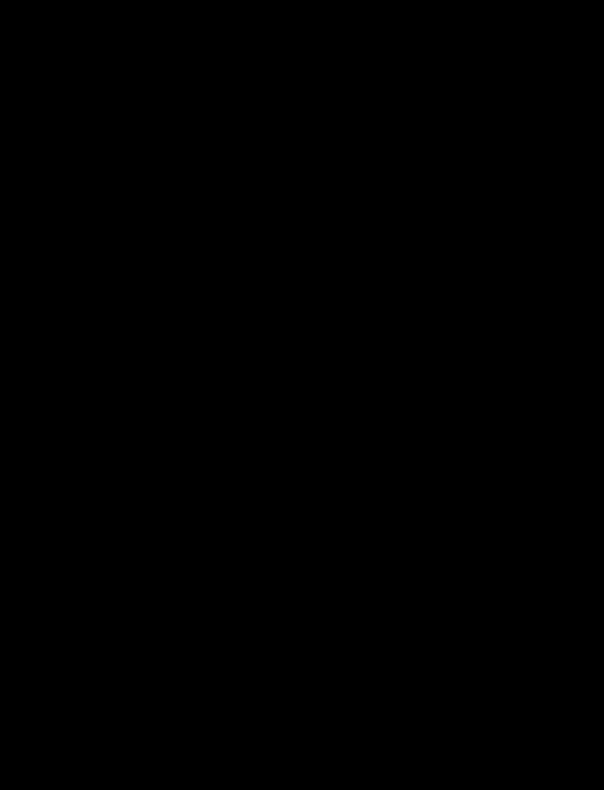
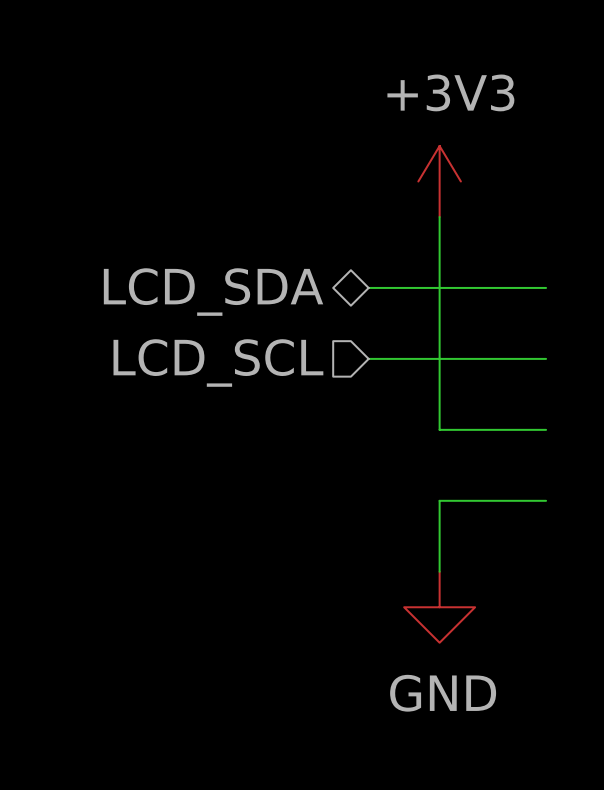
power symbol: none -> +3V3 (439, 181)
wire: none -> (439, 216) (439, 429) (546, 429)
wire: none -> (368, 287) (546, 287)
hierarchical label: none -> LCD_SDA (213, 292)
wire: none -> (368, 358) (546, 358)
hierarchical label: none -> LCD_SCL (218, 363)
wire: none -> (546, 500) (439, 500) (439, 571)
power symbol: none -> GND (439, 607)

